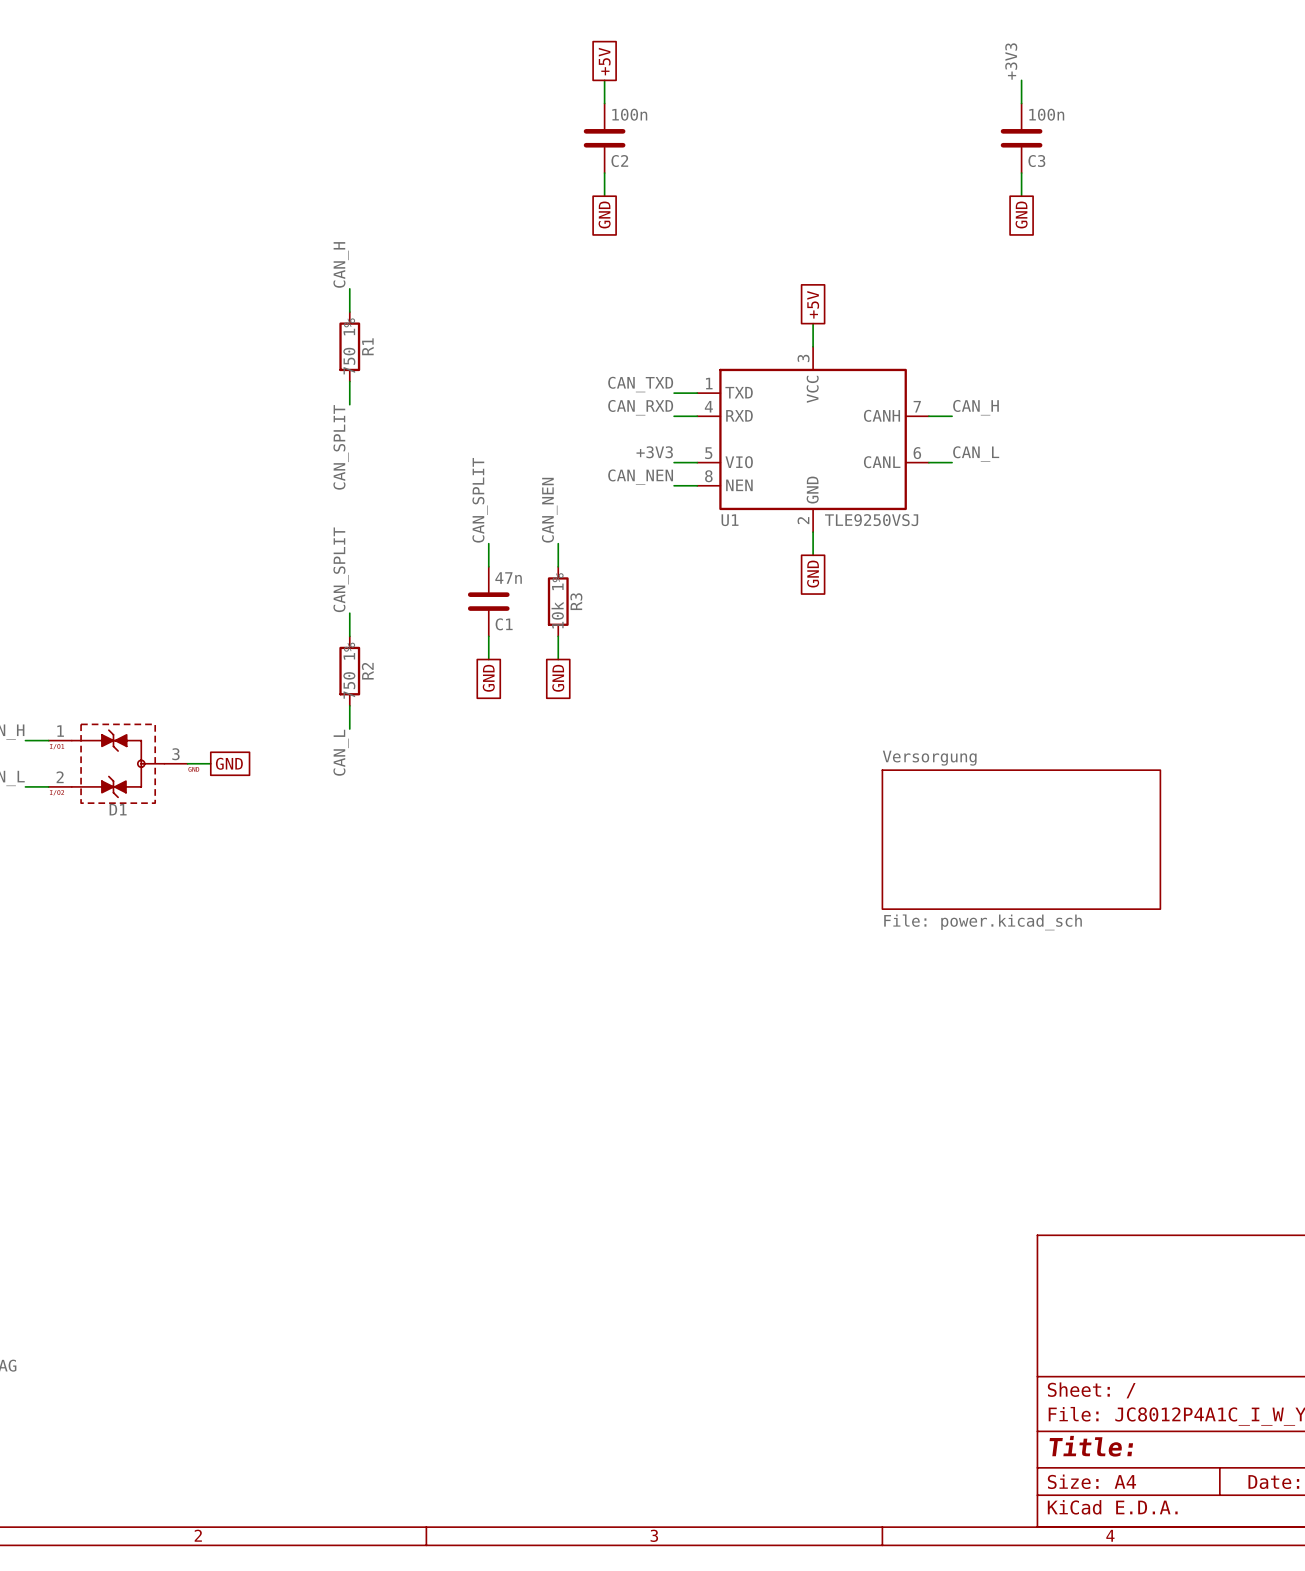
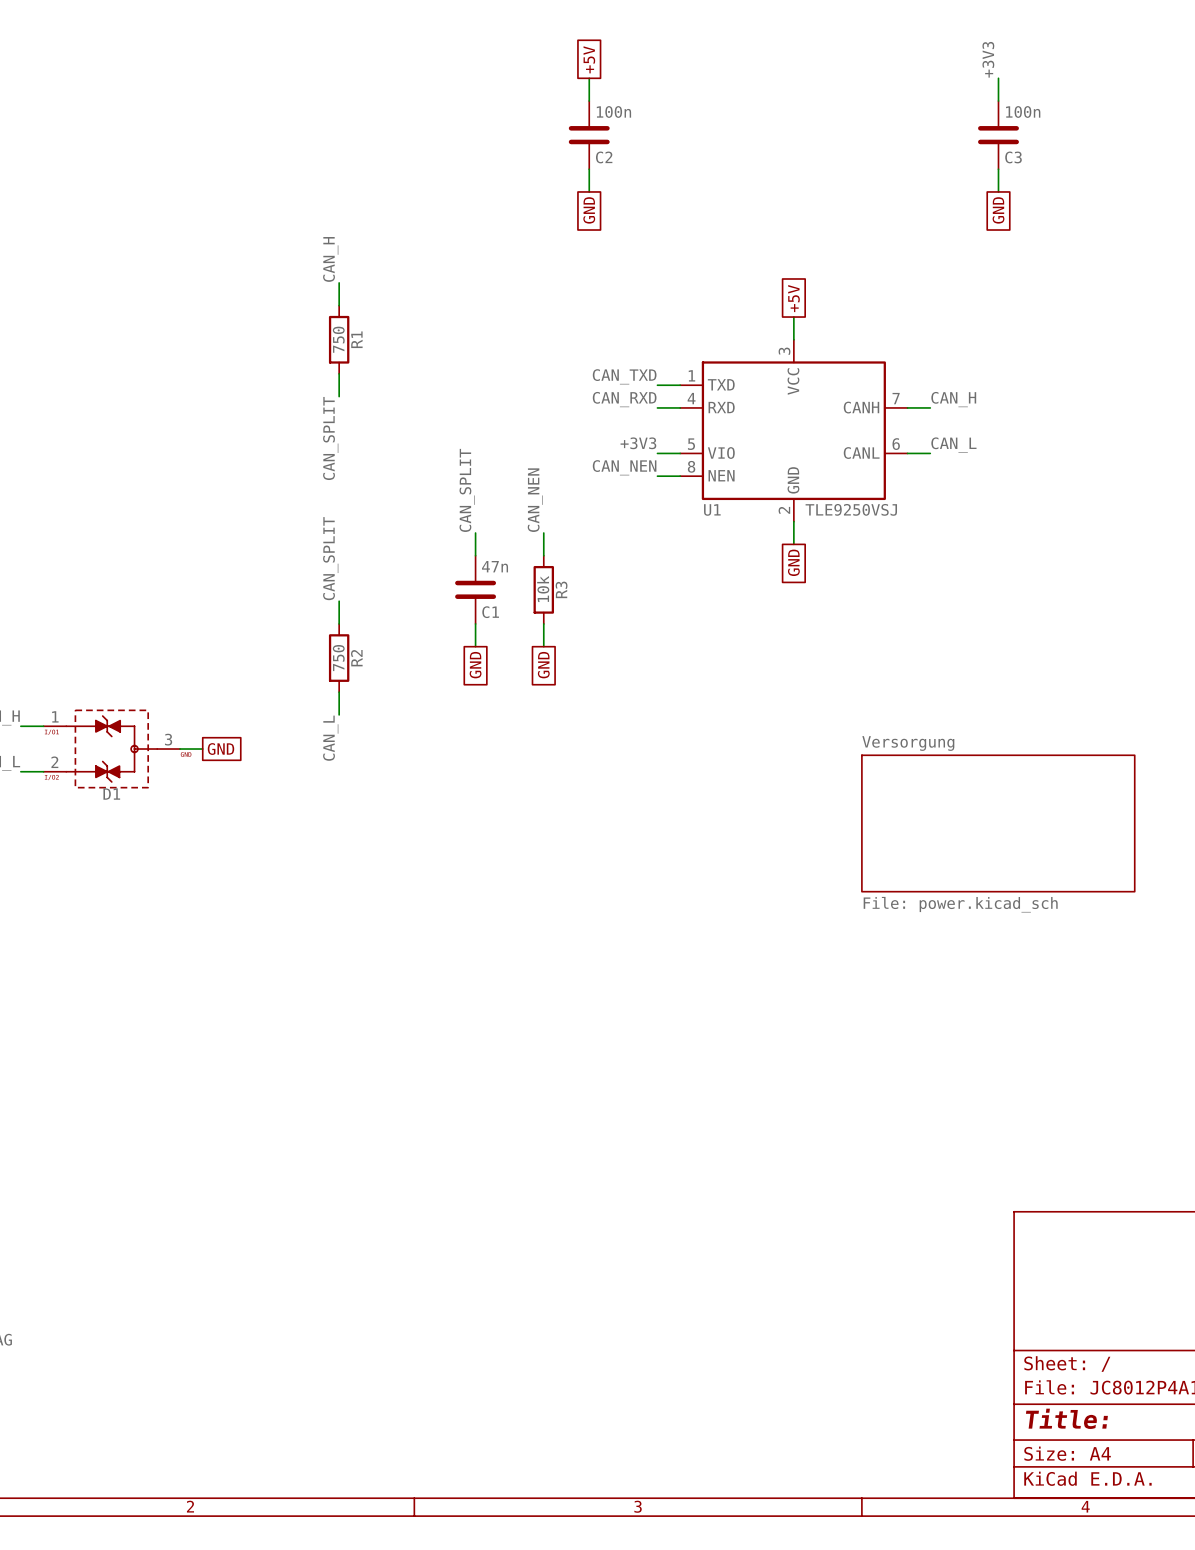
R1 value: 750 1% (349, 346) -> 750 (338, 339)
R3 value: 10k 1% (557, 600) -> 10k (543, 589)
R2 value: 750 1% (349, 670) -> 750 (338, 658)

